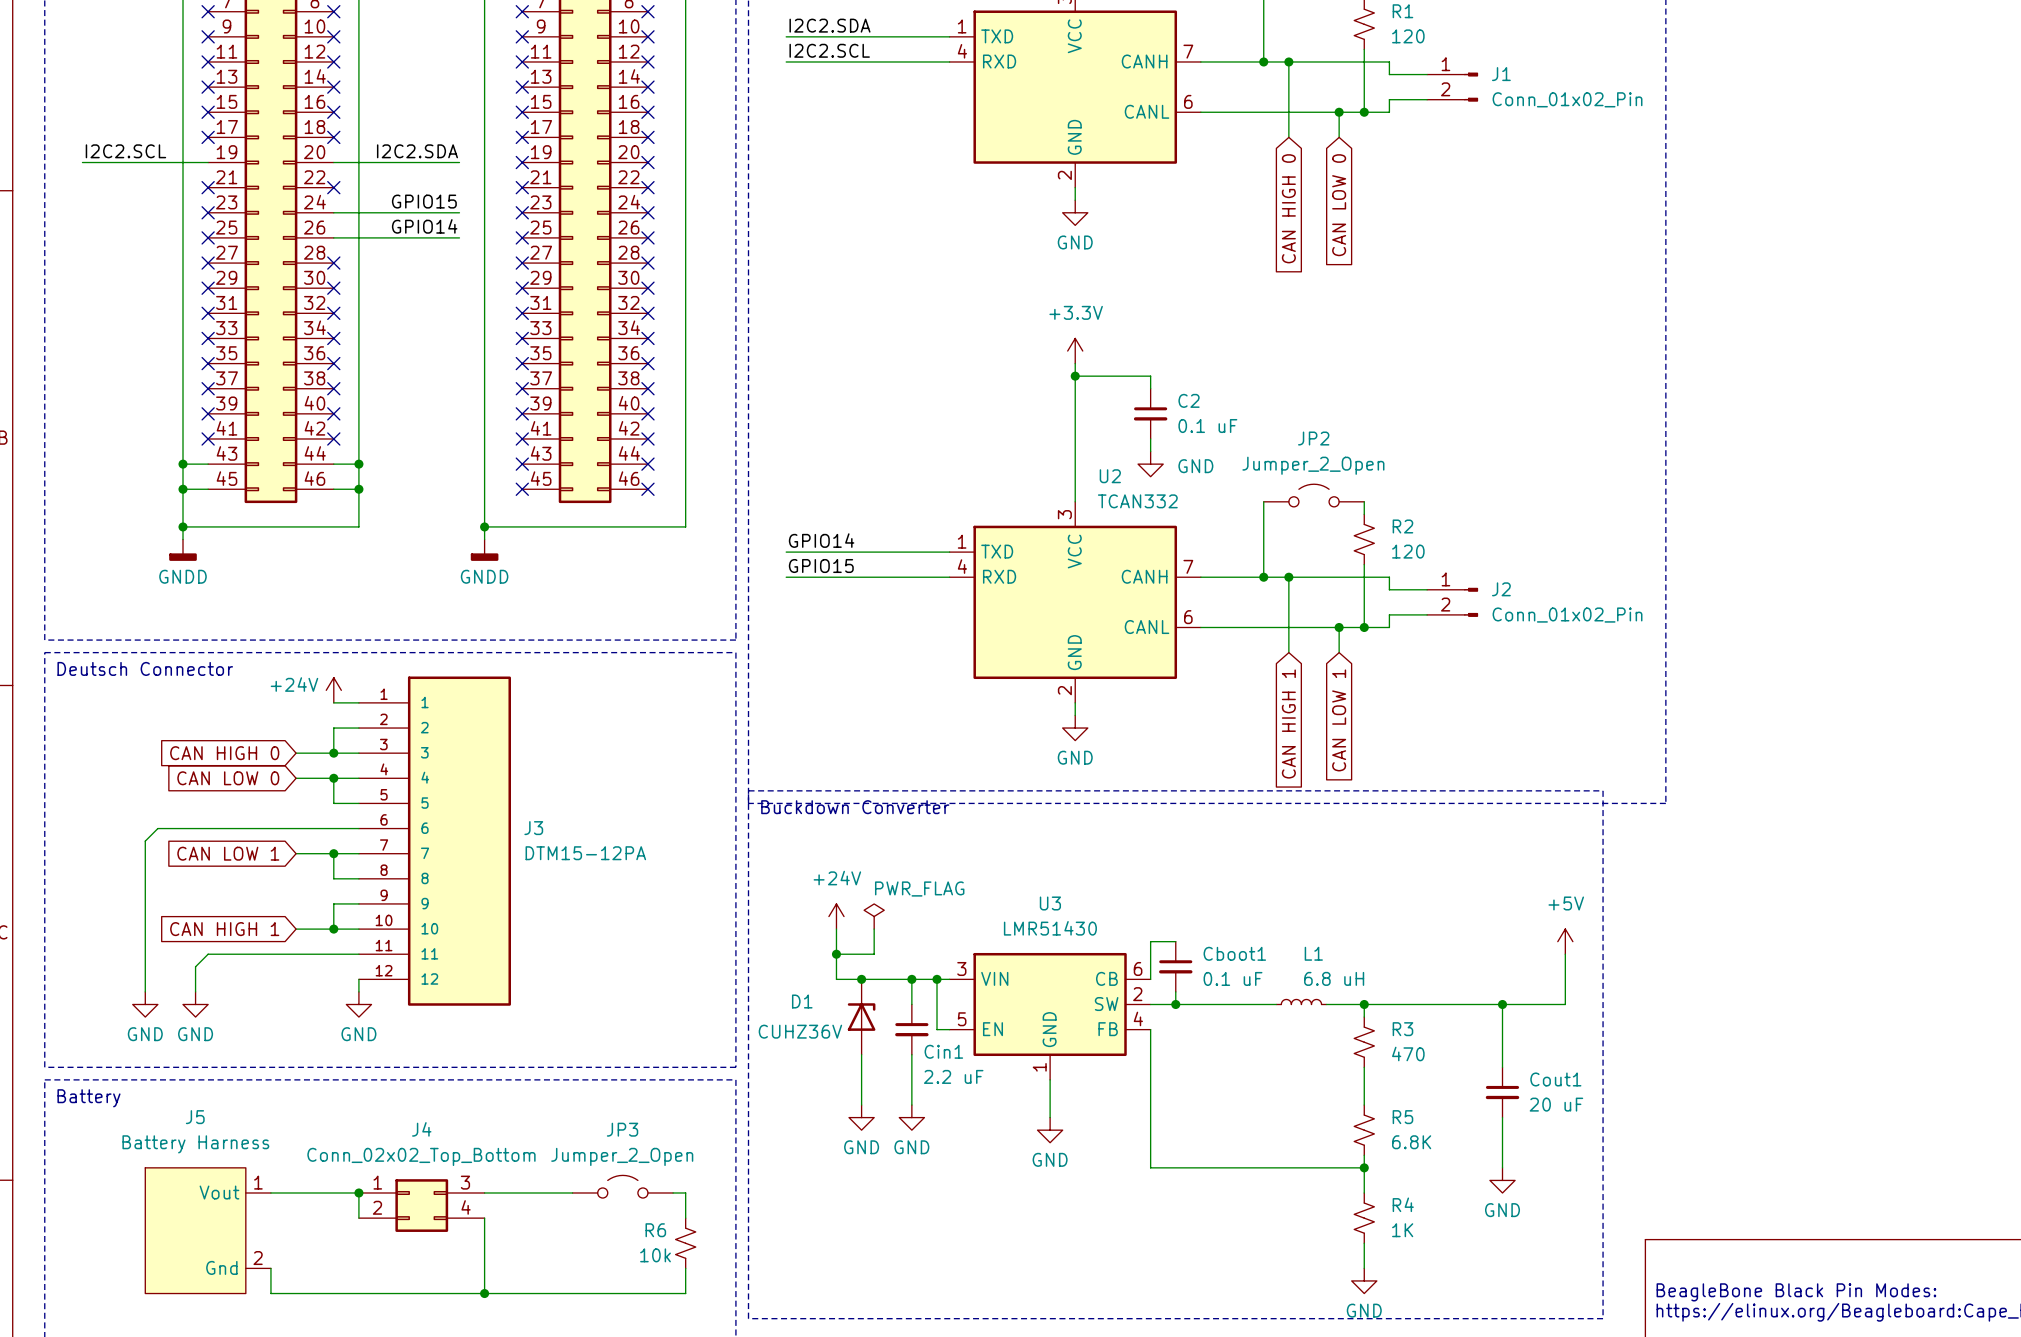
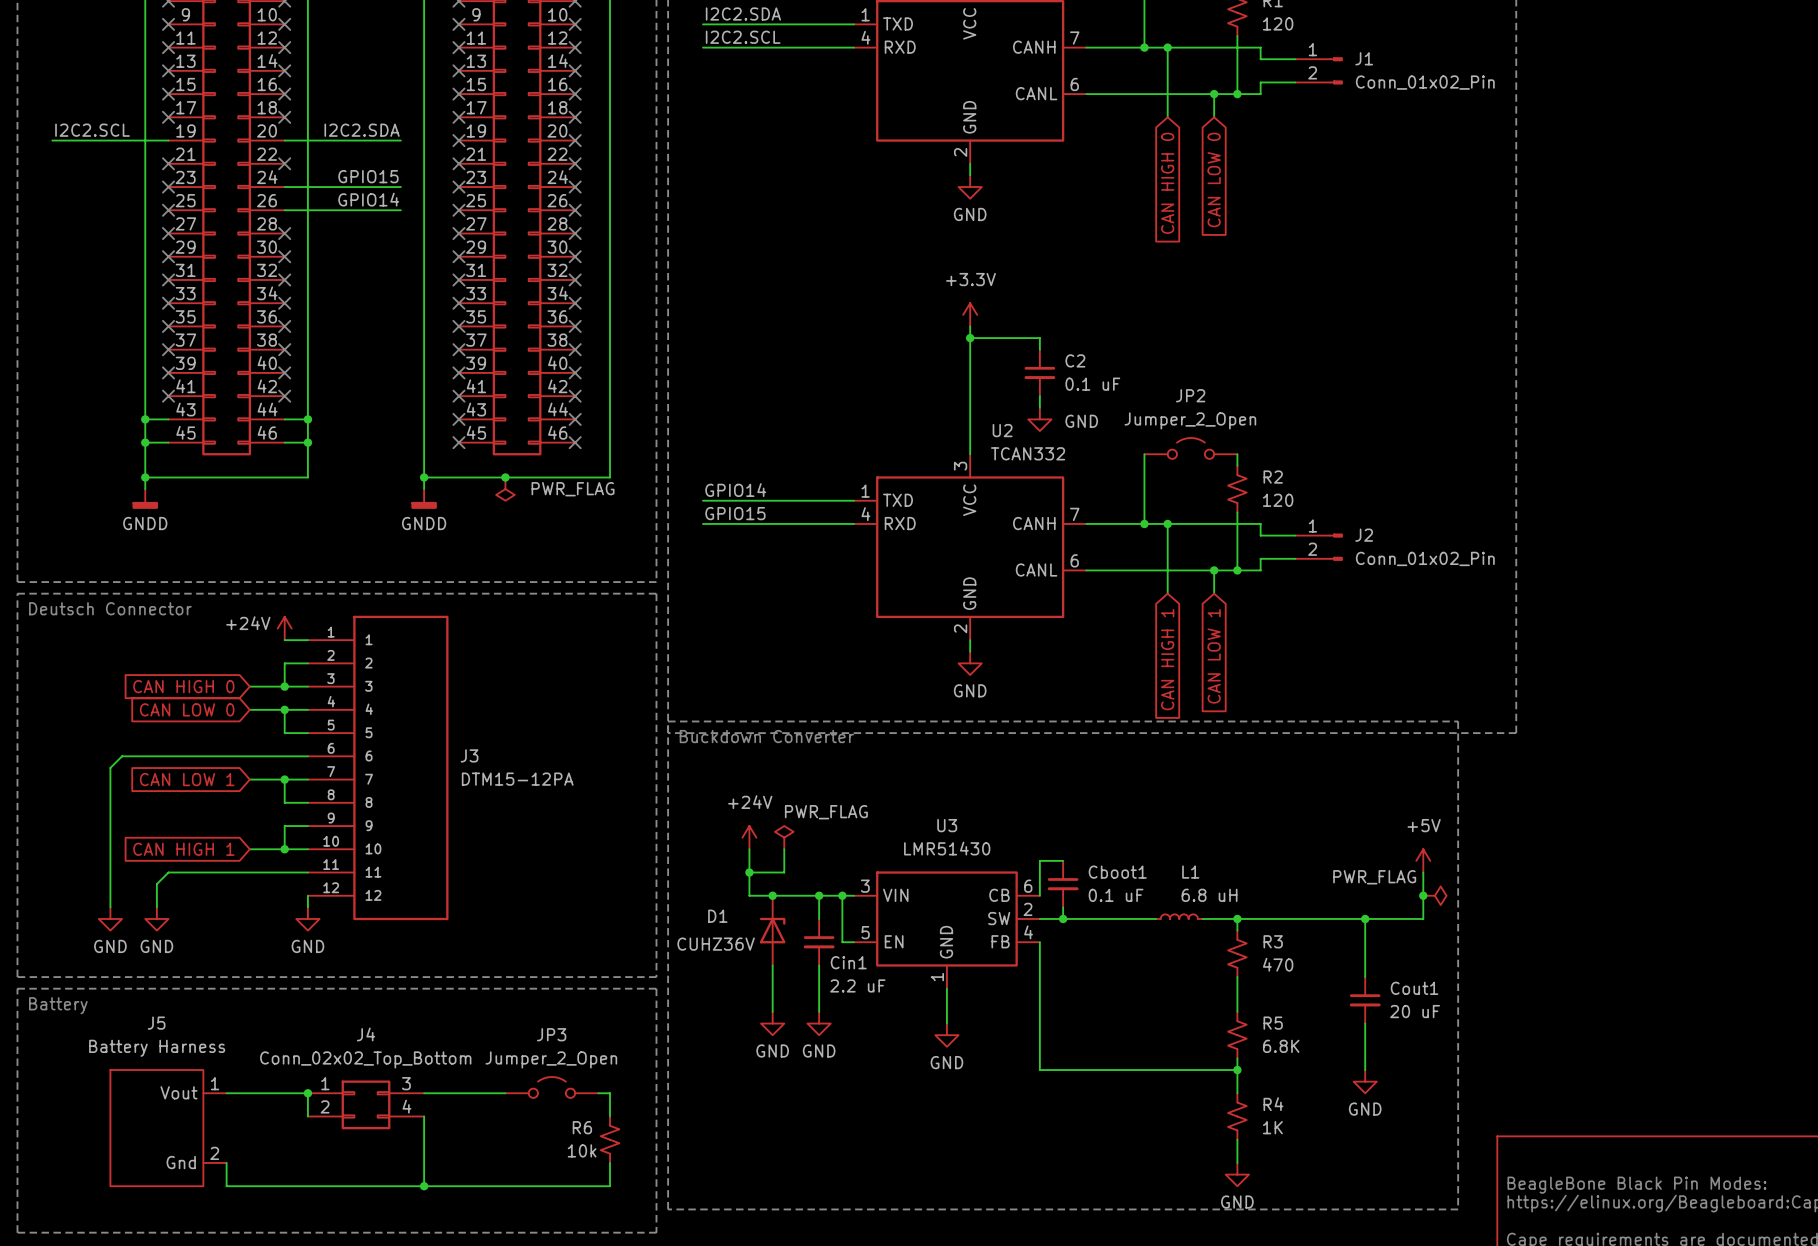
junction: none -> (505, 477)
power symbol: none -> PWR_FLAG (505, 489)
junction: none -> (1423, 895)
power symbol: none -> PWR_FLAG (1434, 895)

